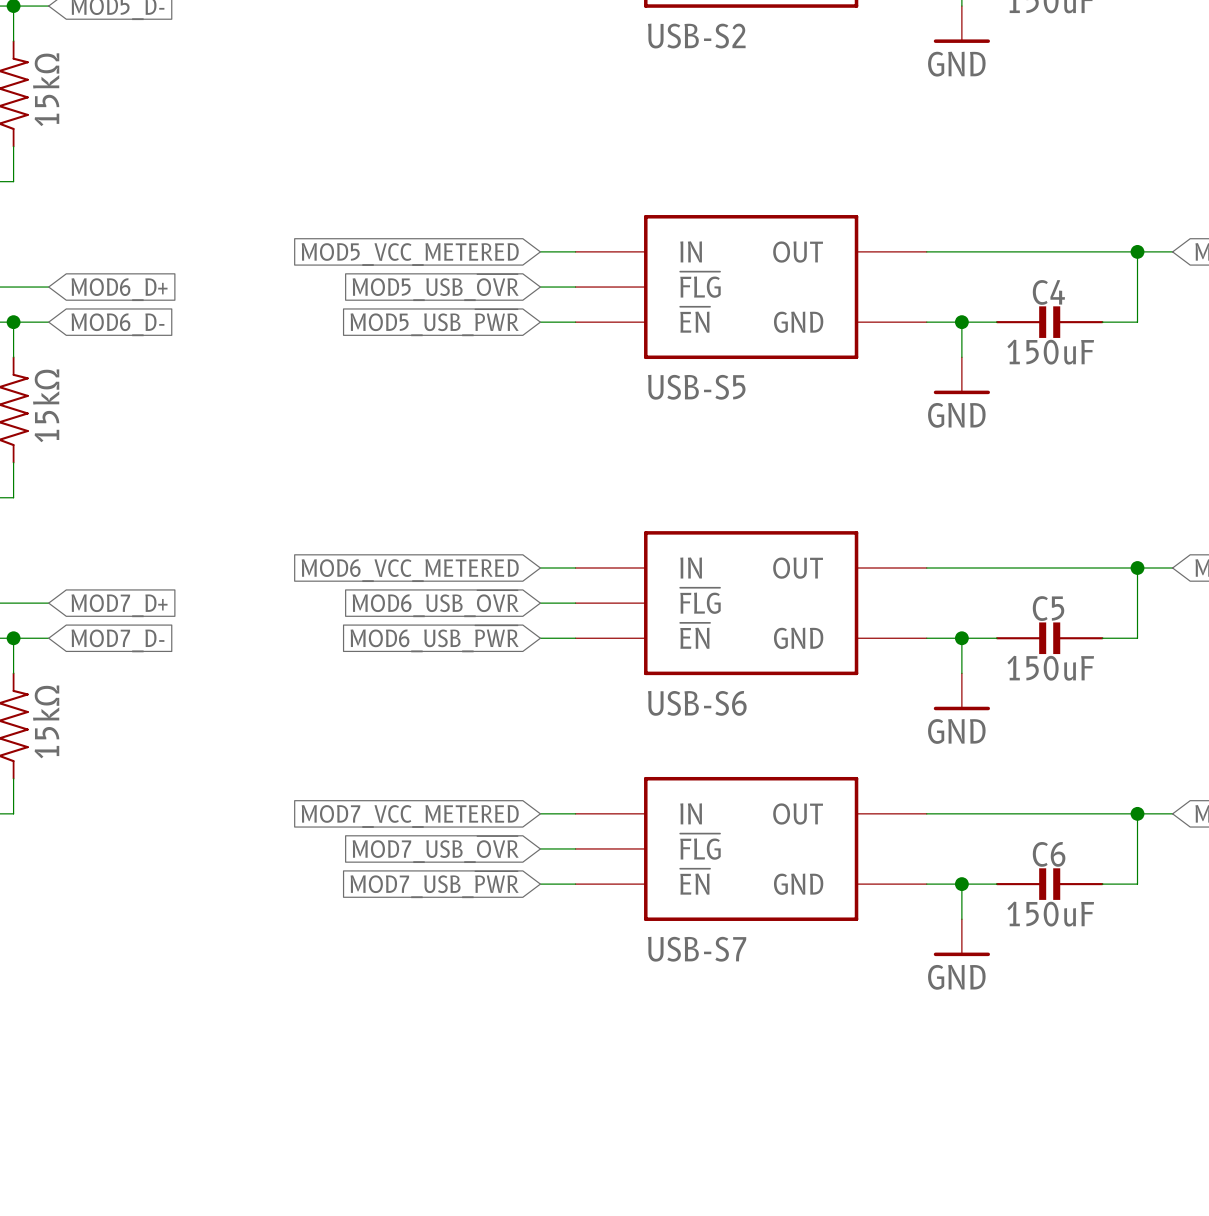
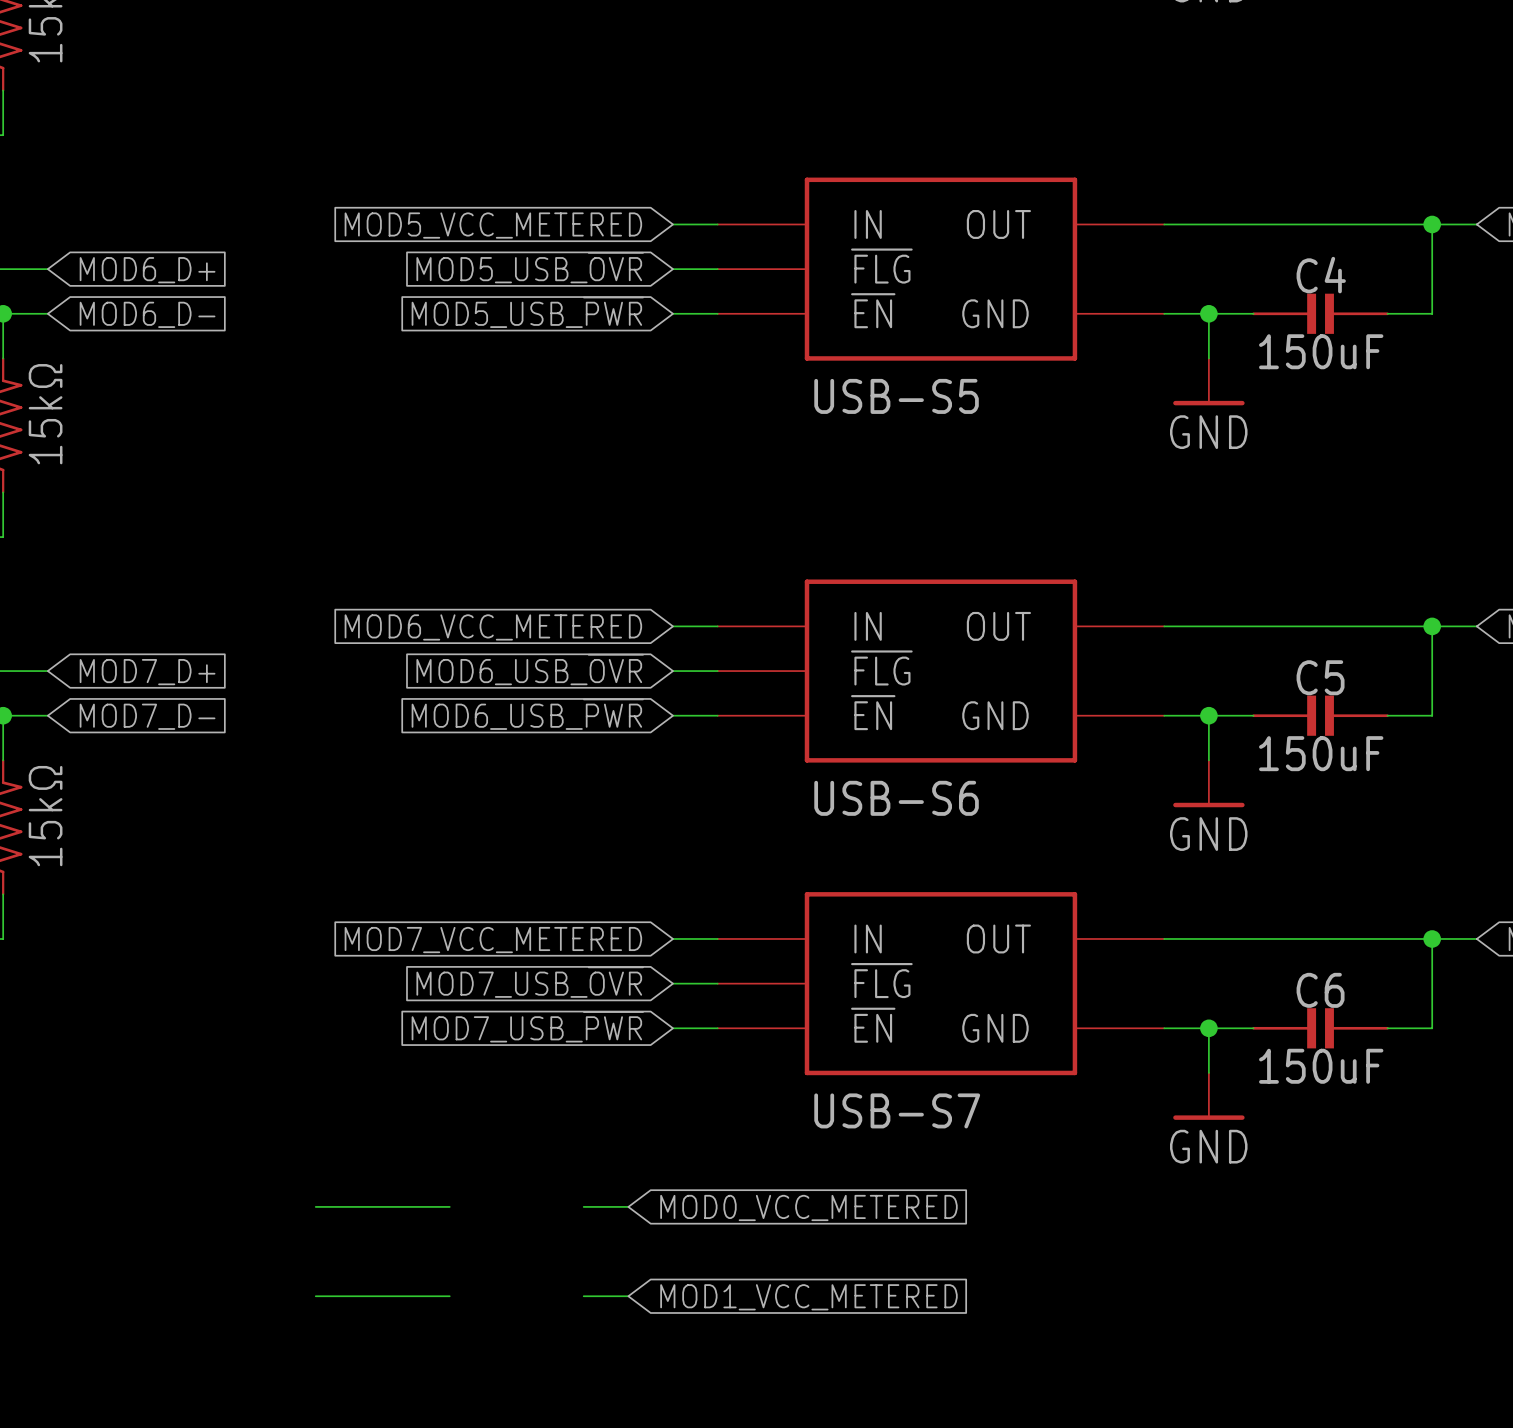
wire: none -> (315, 1206) (449, 1206)
wire: none -> (583, 1206) (628, 1206)
global label: none -> MOD0_VCC_METERED (808, 1207)
wire: none -> (315, 1296) (449, 1296)
wire: none -> (583, 1296) (628, 1296)
global label: none -> MOD1_VCC_METERED (808, 1297)

